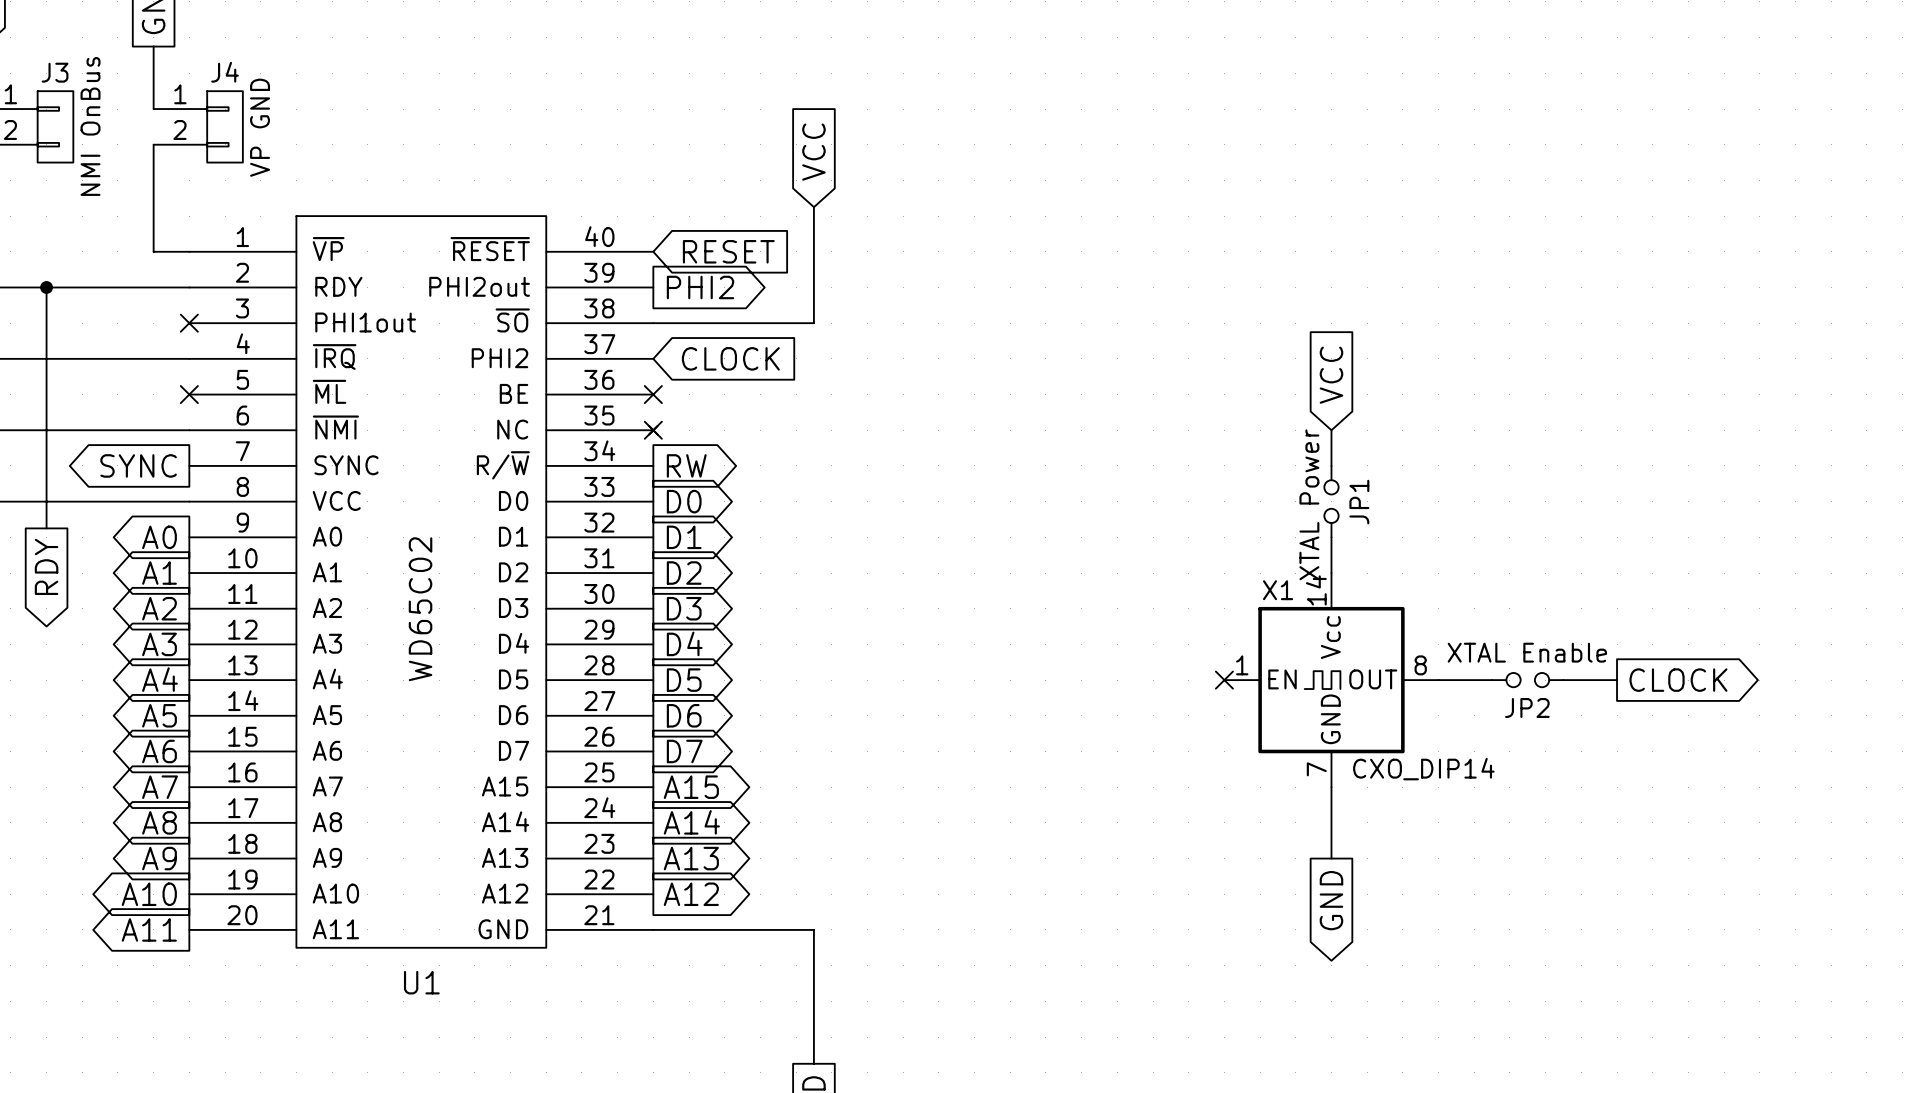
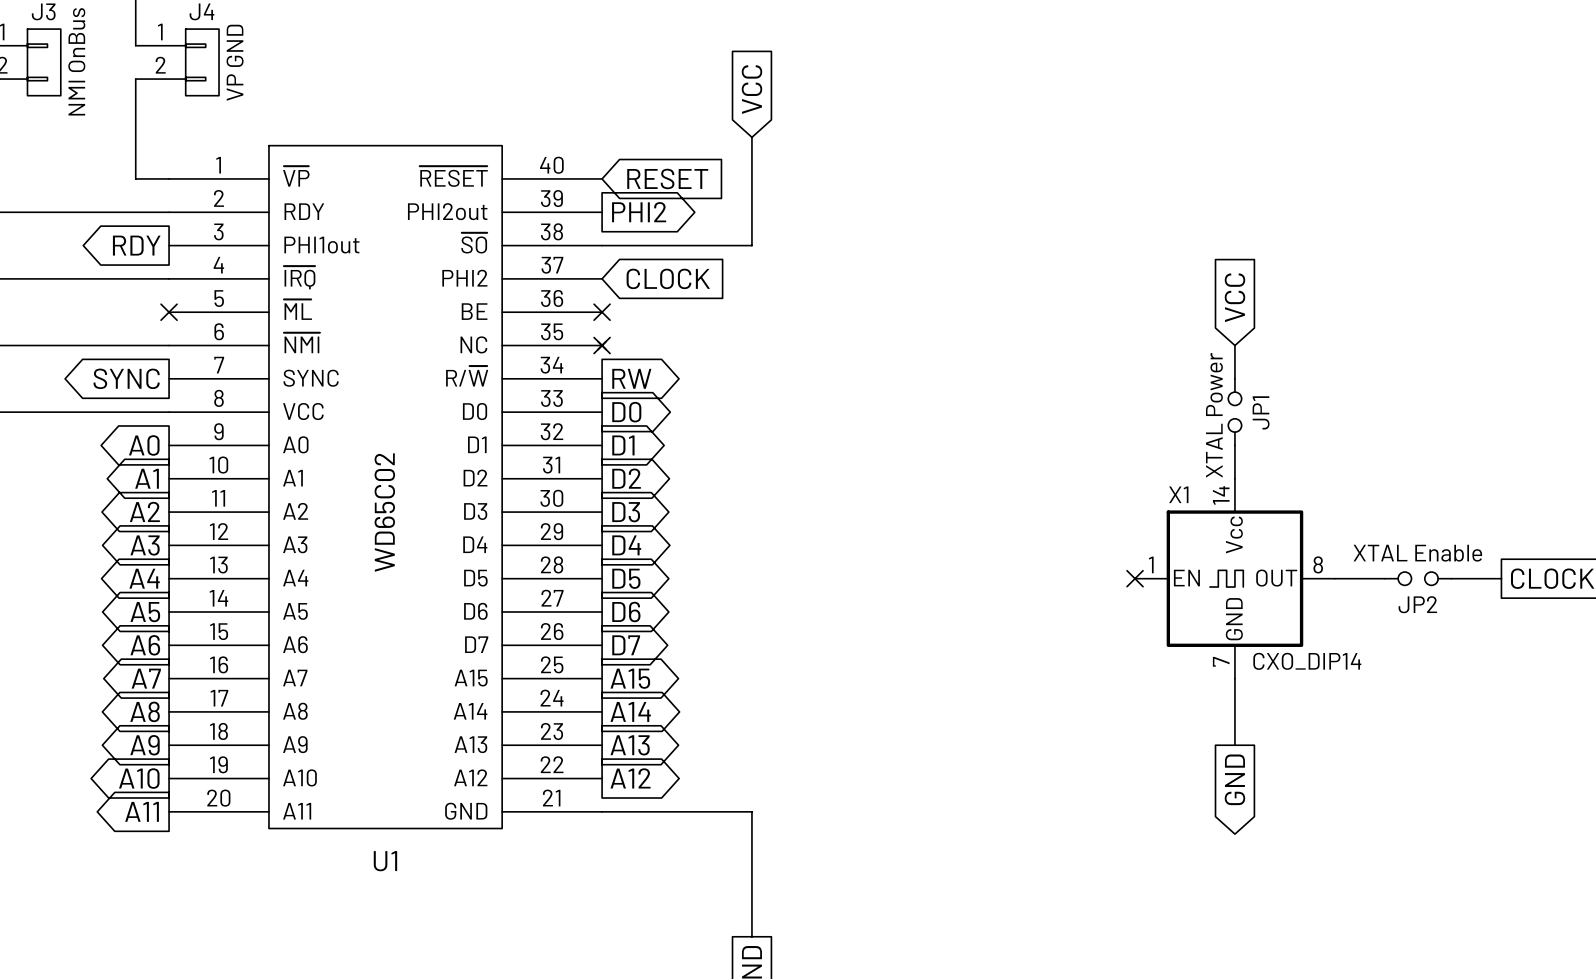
wire: (46, 287) (46, 528) -> none
junction: (46, 287) -> none
no-connect mark: (189, 323) -> none
global label rotation: 0° (46, 566) -> 90° clockwise (136, 245)
global label position: RDY (46, 566) -> RDY (136, 245)

